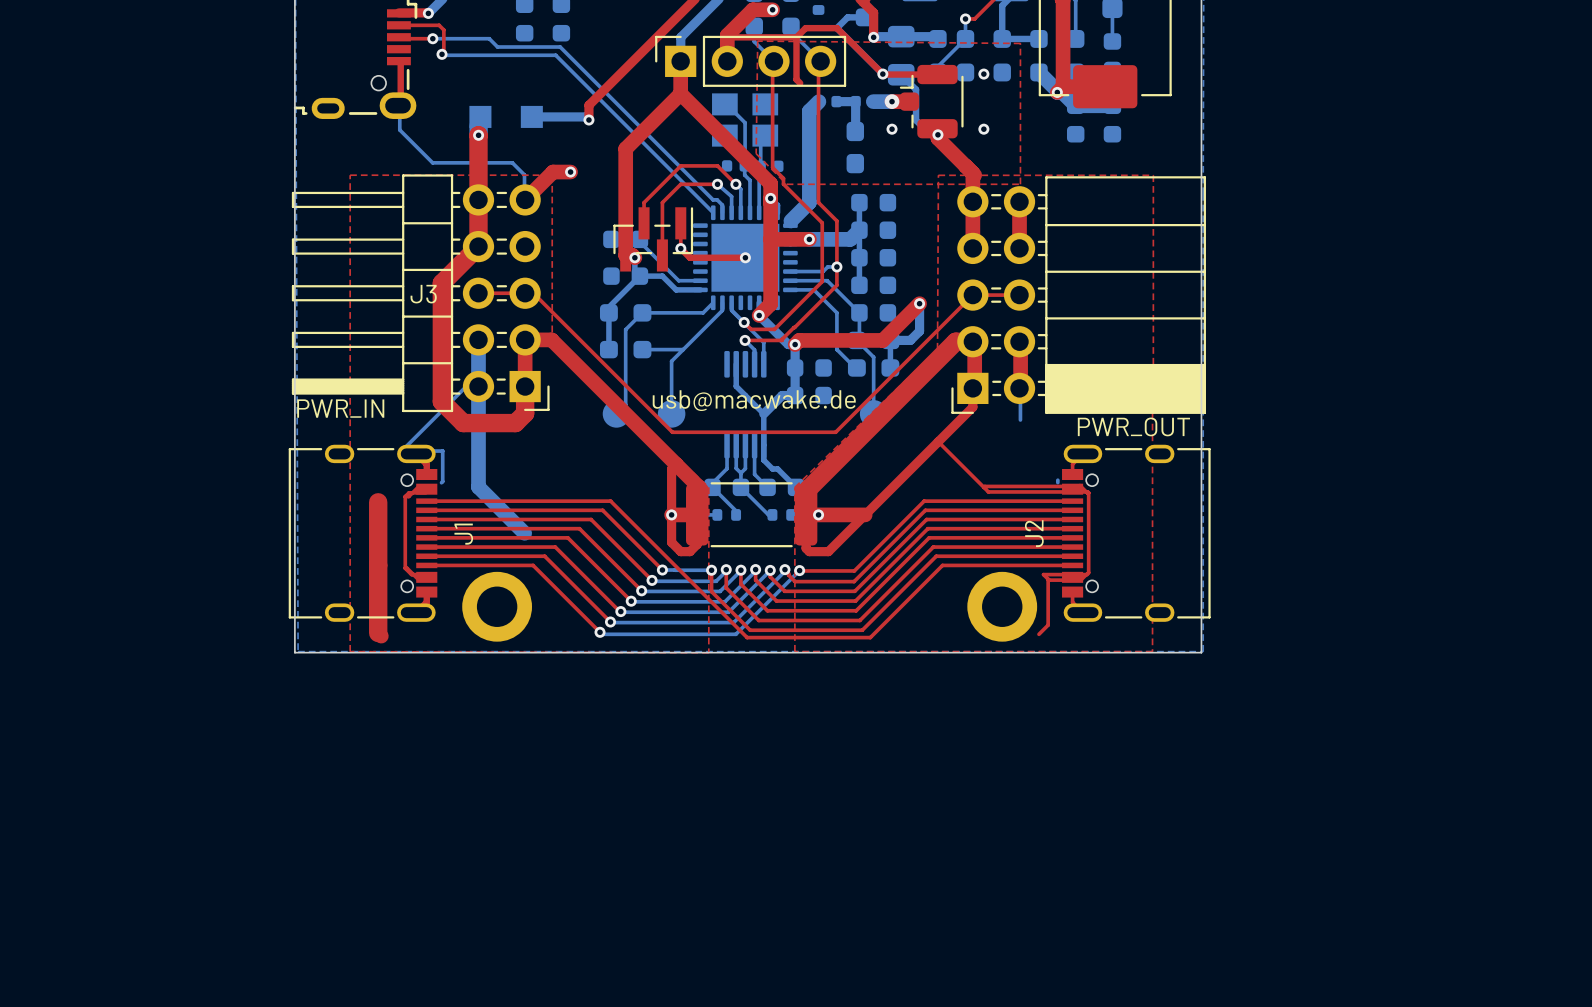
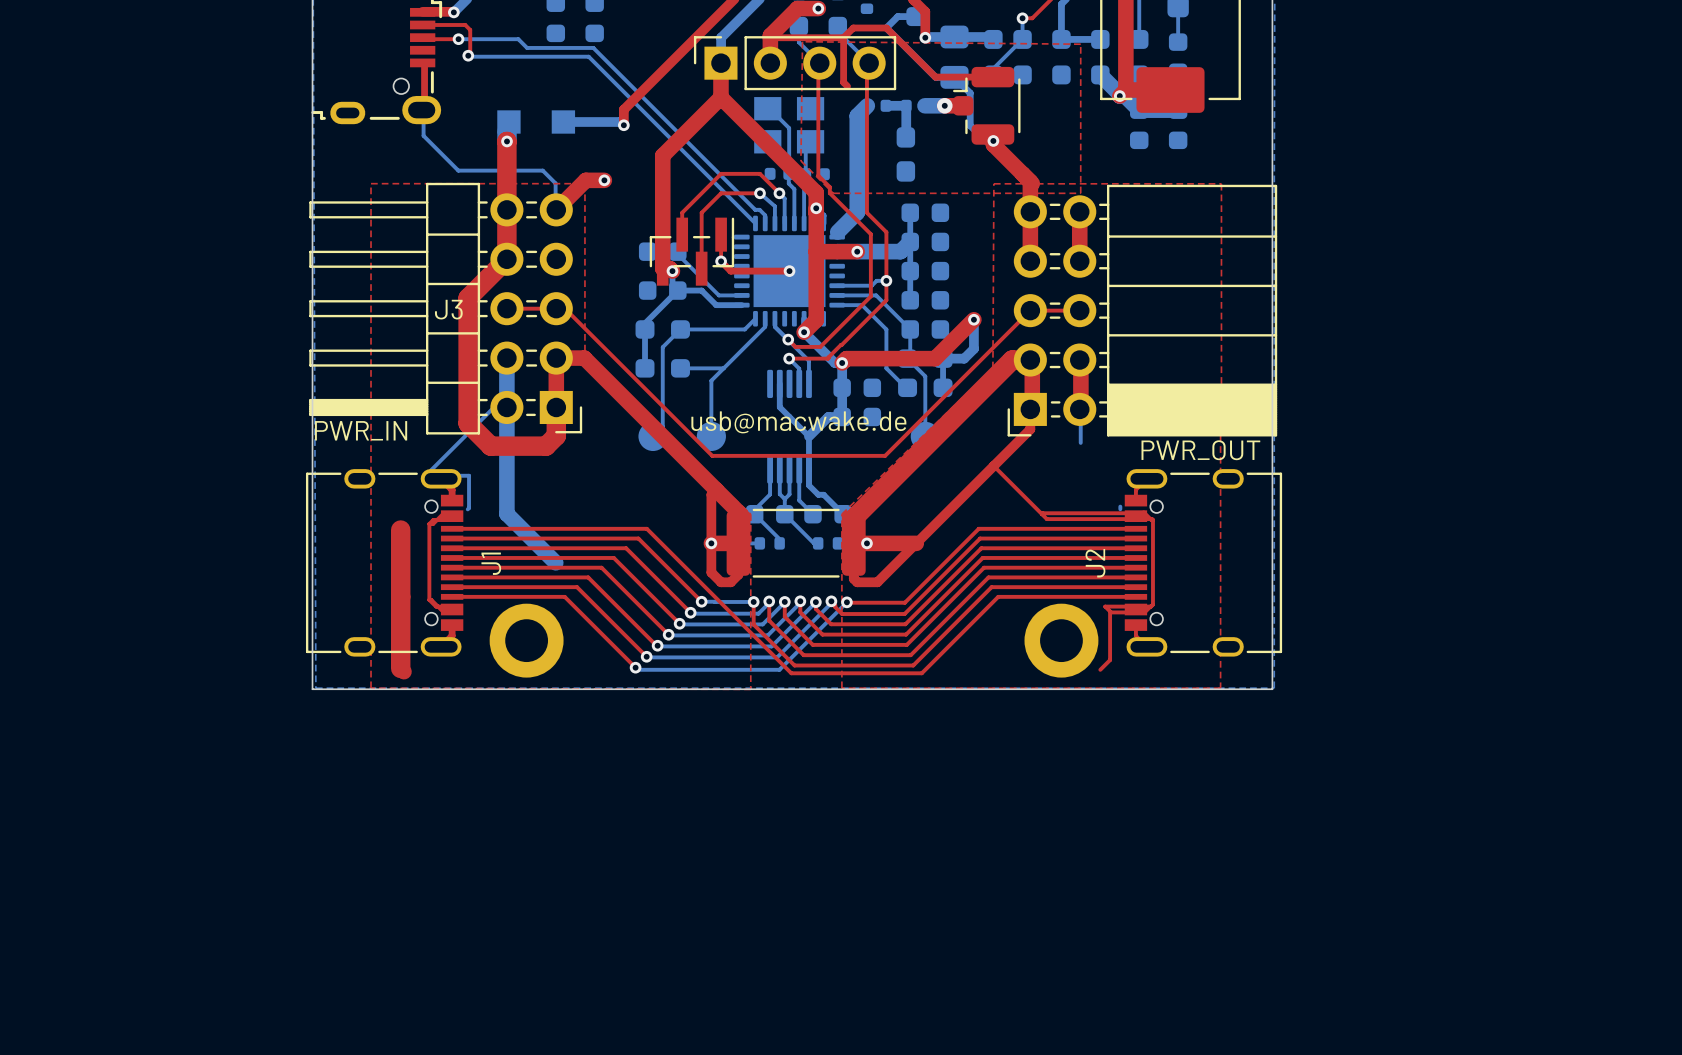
via: (882, 74) -> none
via: (983, 74) -> none
via: (892, 129) -> none
via: (983, 129) -> none

